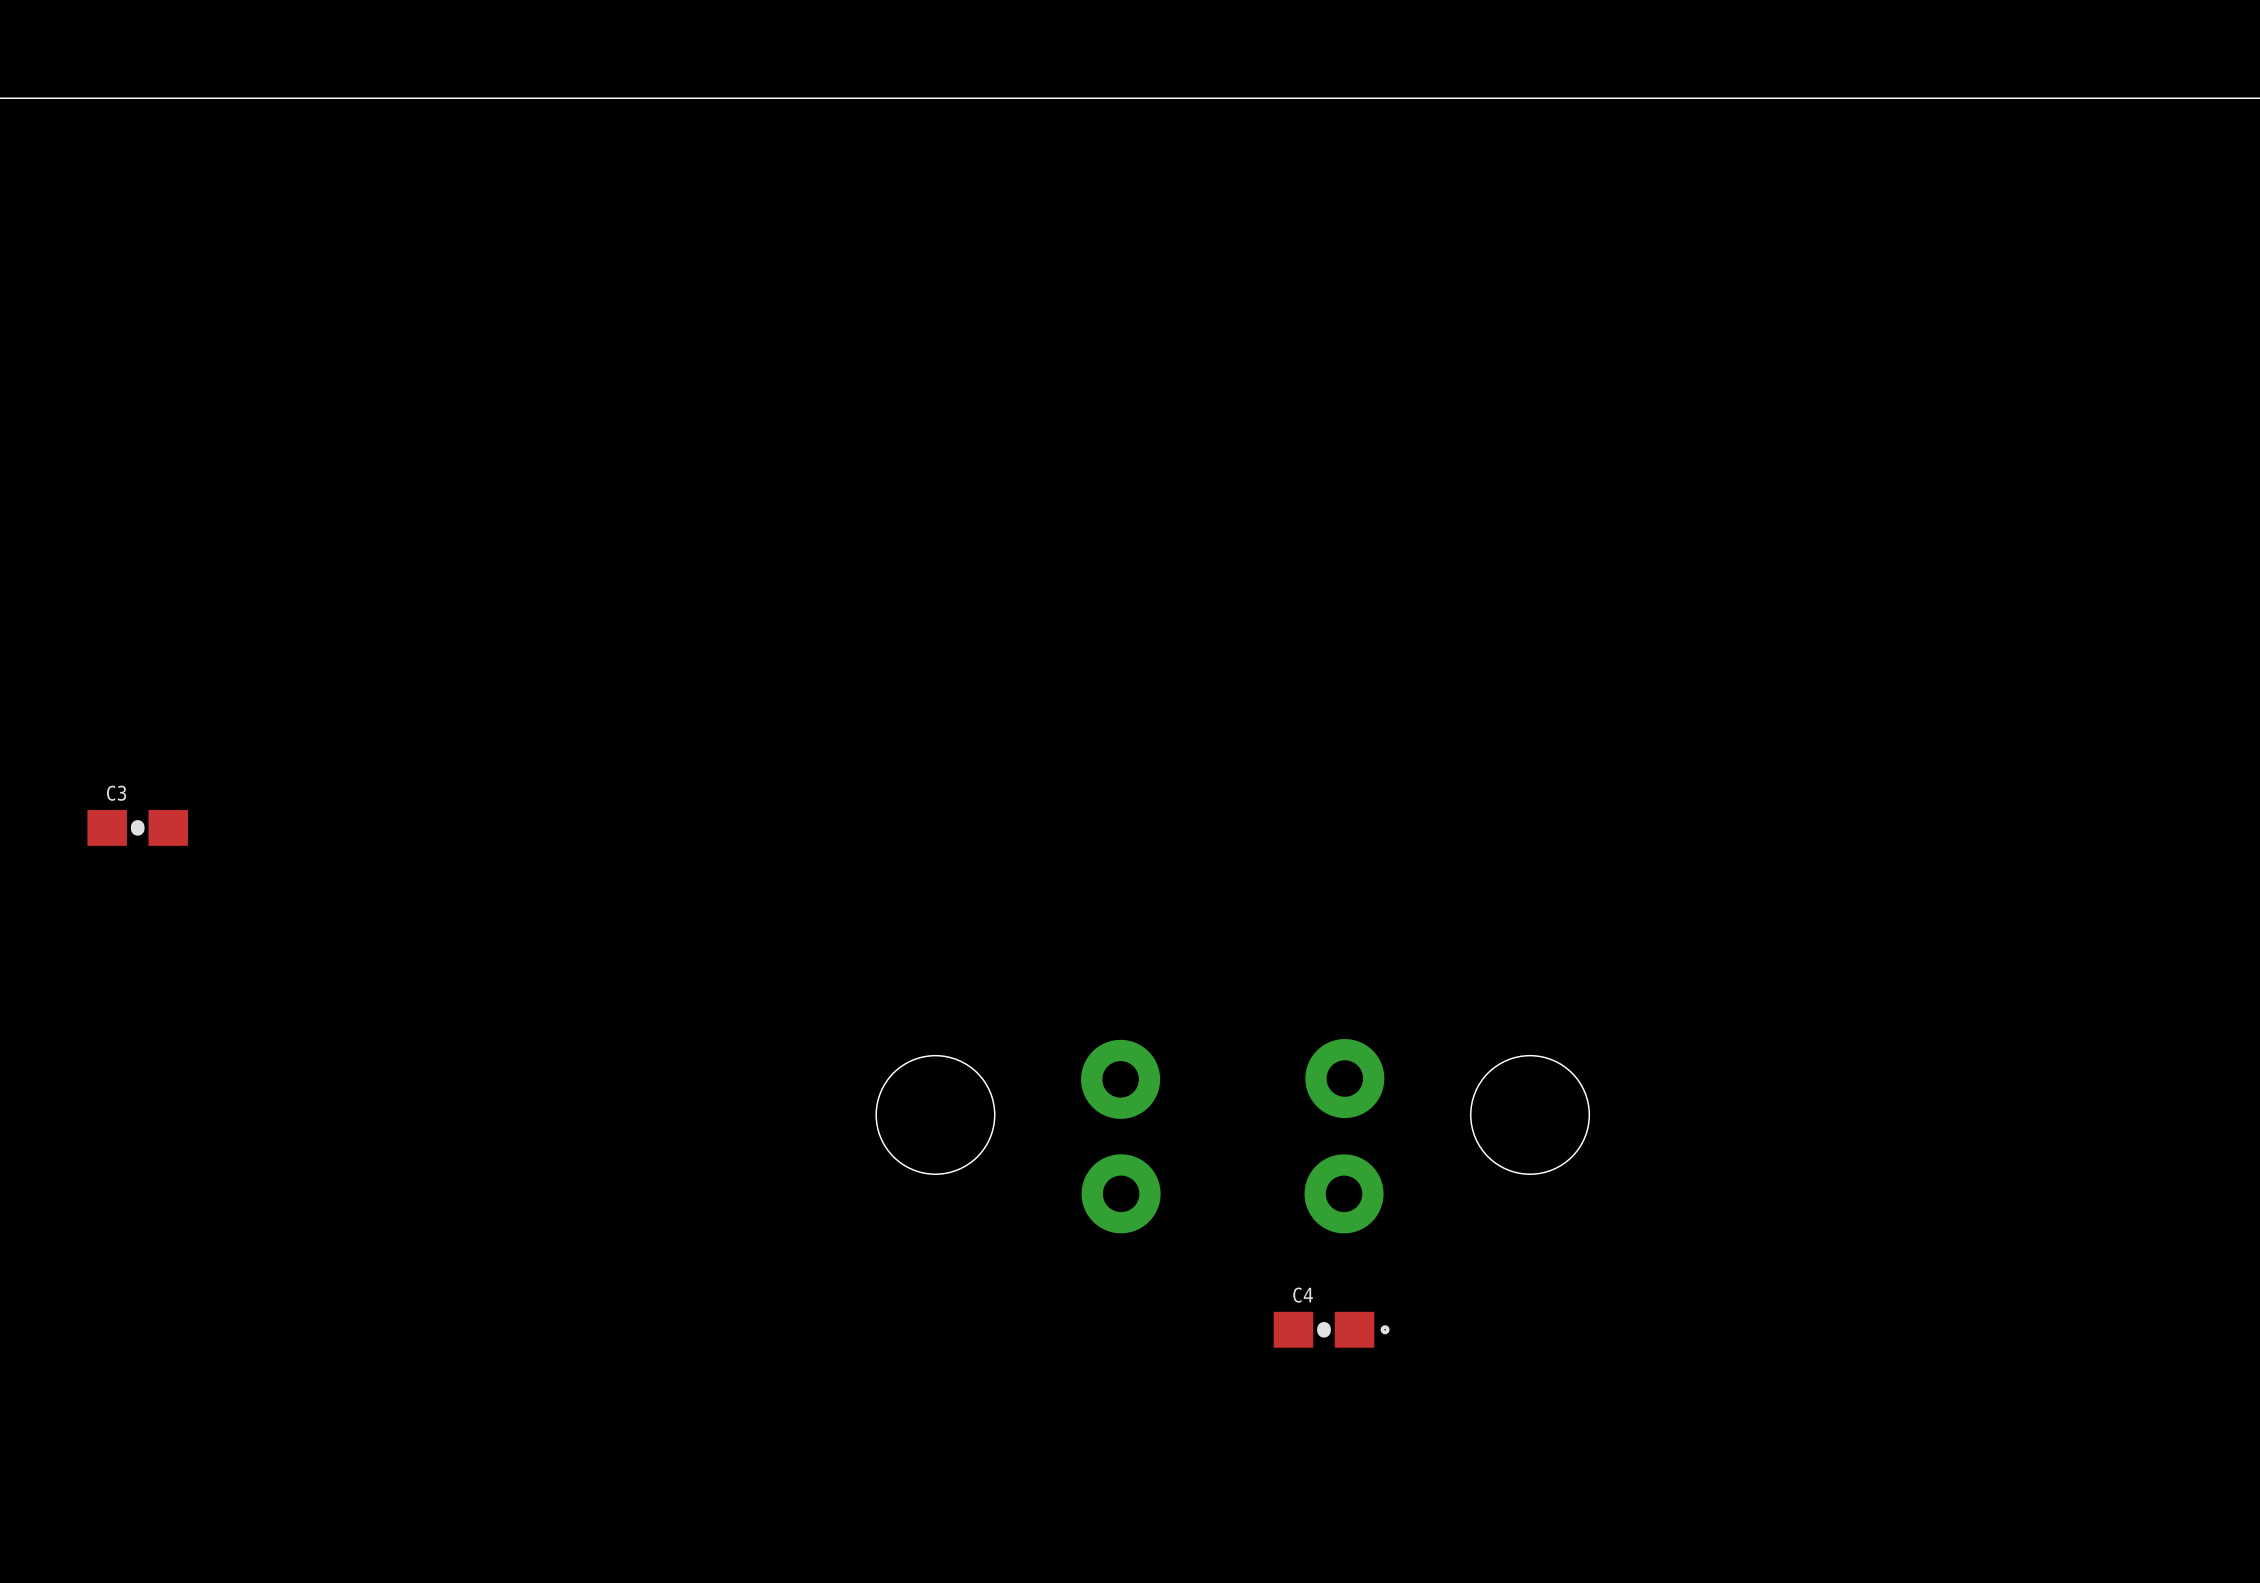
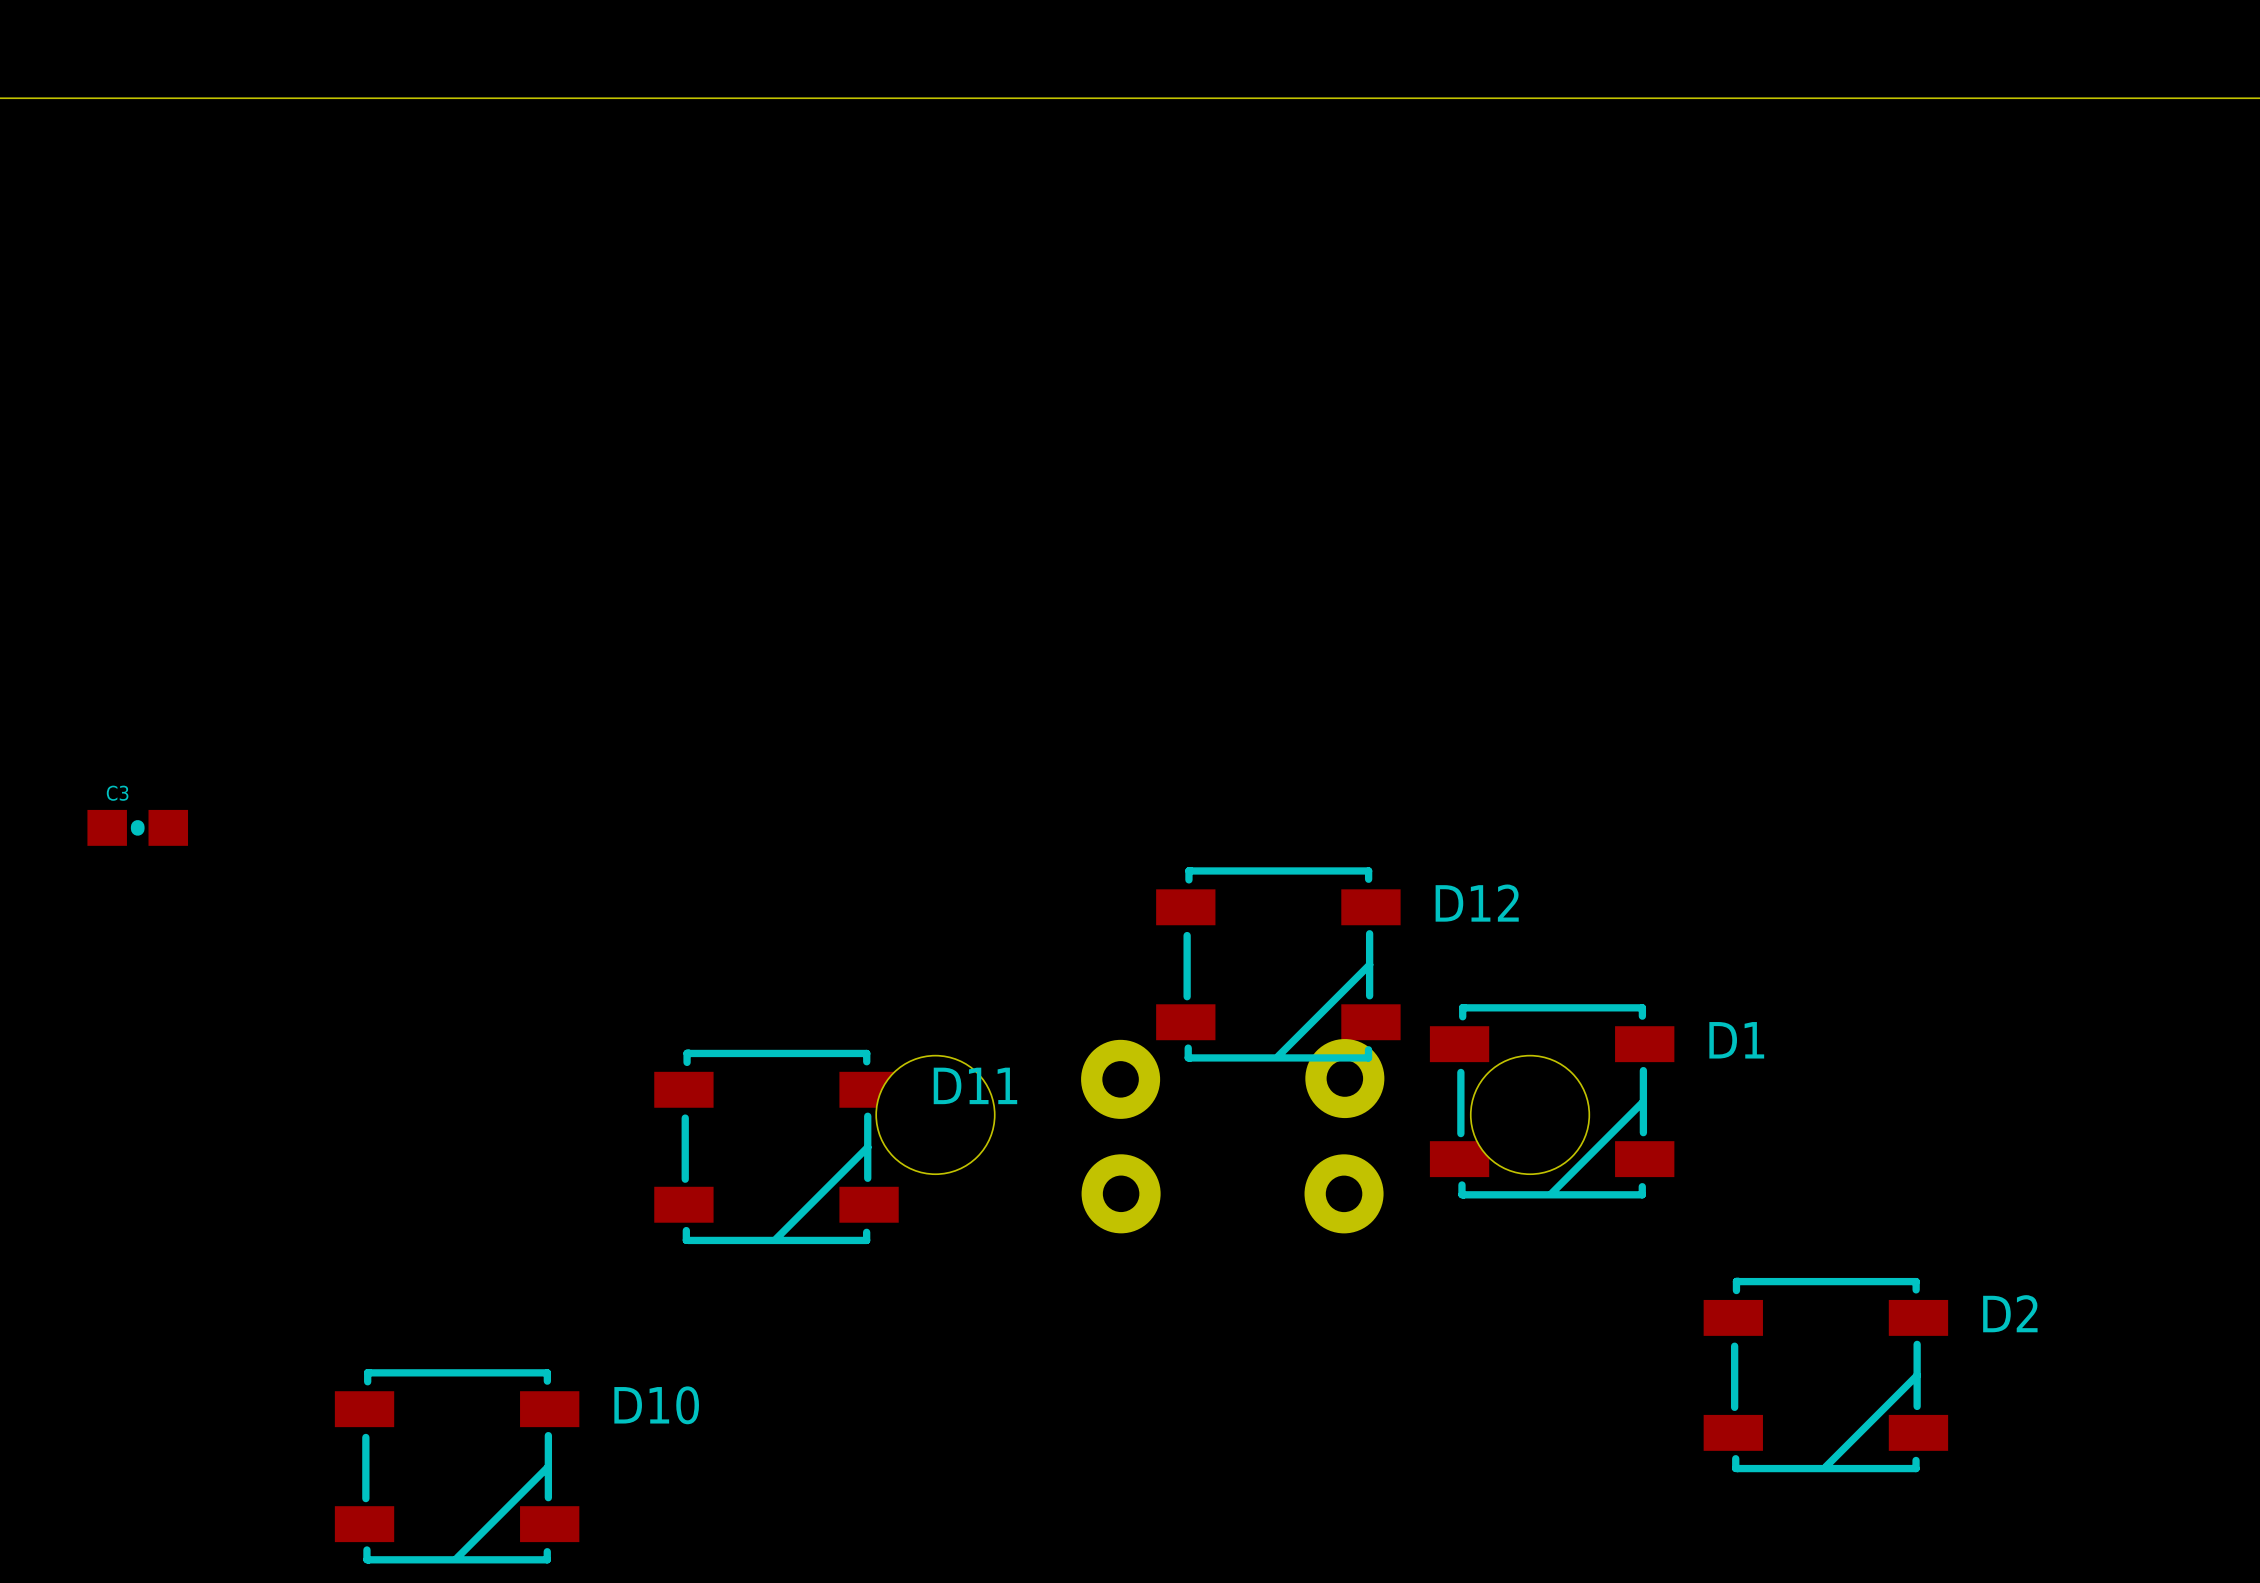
D12: none -> (1278, 964)
D1: none -> (1552, 1101)
D11: none -> (776, 1146)
C4: (1331, 1329) -> none
D2: none -> (1825, 1374)
D10: none -> (457, 1466)

